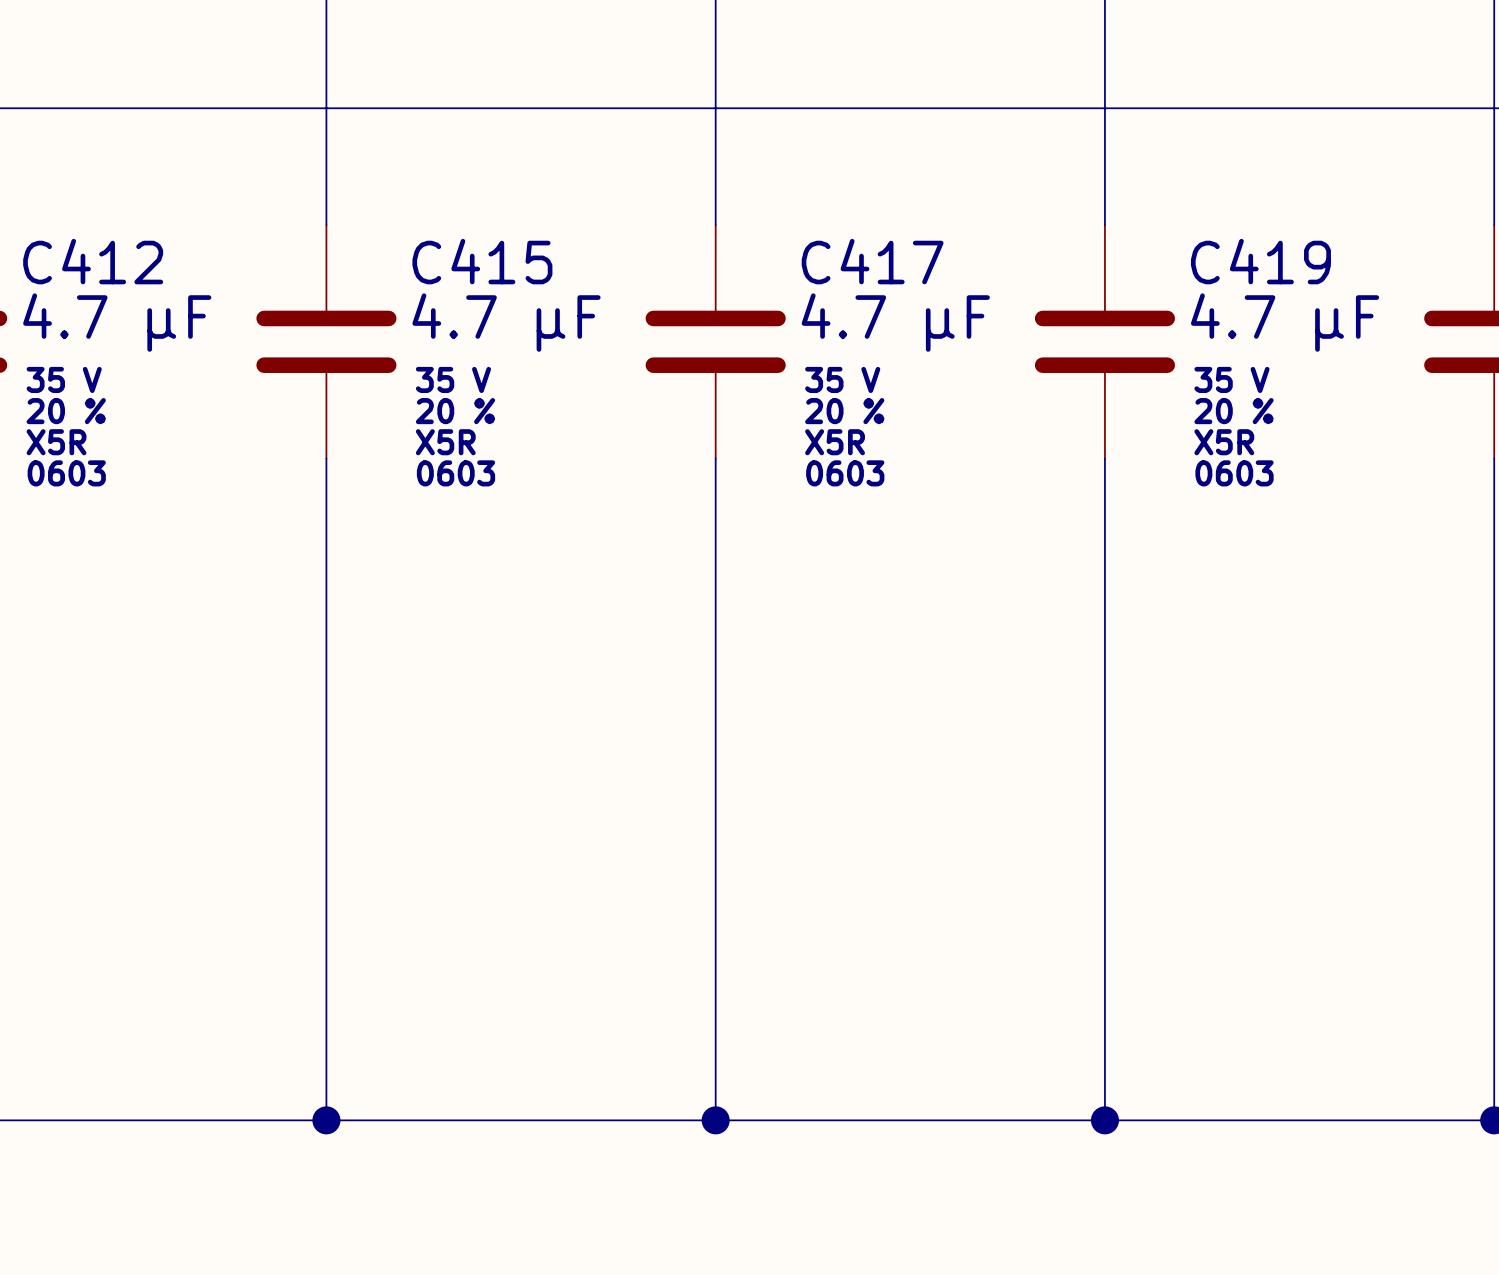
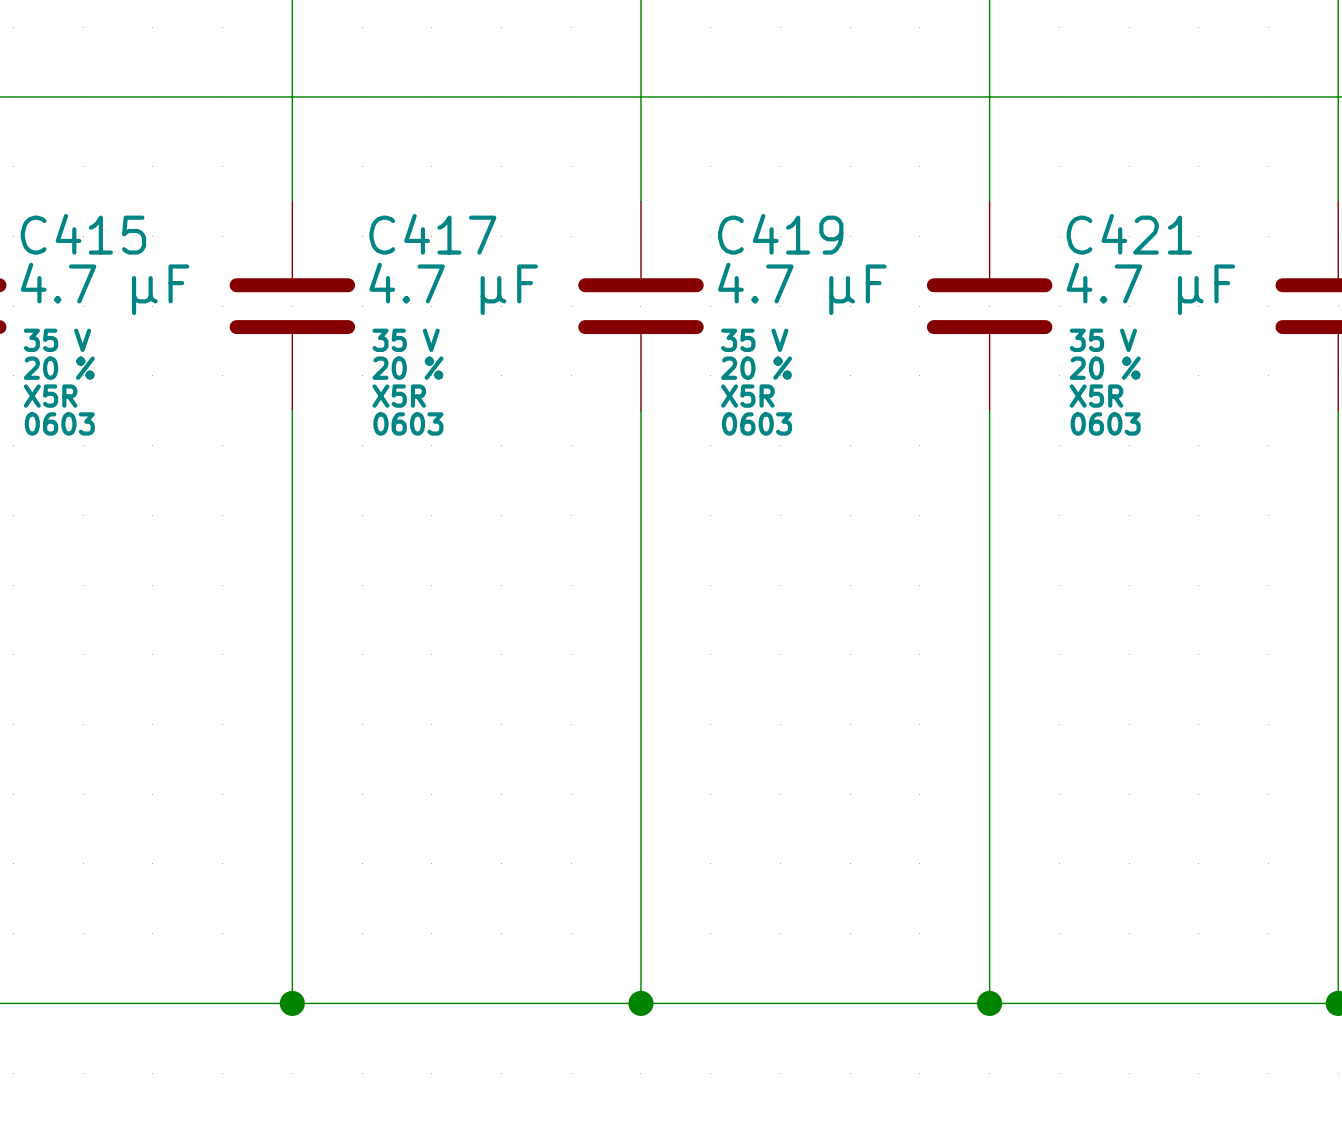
C412 name: C412 (93, 261) -> C415 (83, 234)
C415 name: C415 (482, 261) -> C417 (432, 234)
C417 name: C417 (872, 261) -> C419 (780, 234)
C419 name: C419 (1260, 261) -> C421 (1129, 234)

